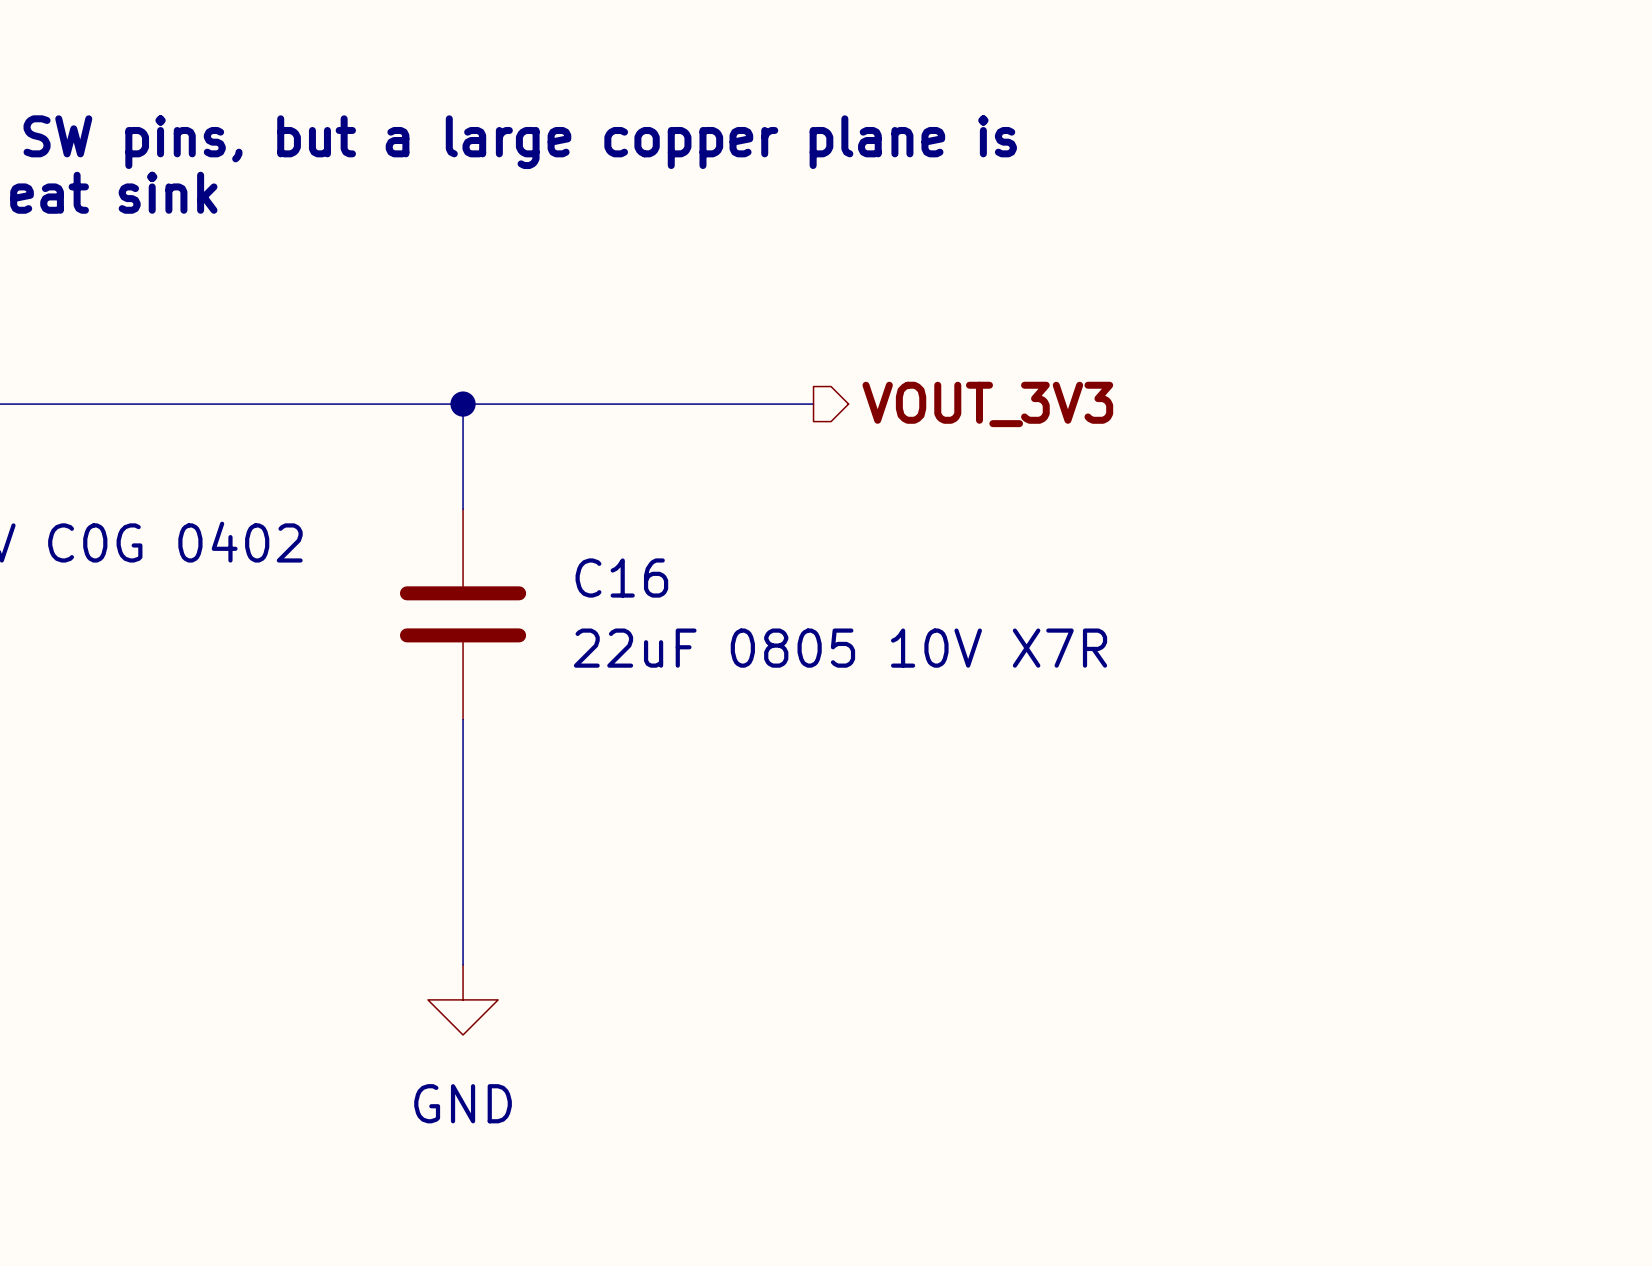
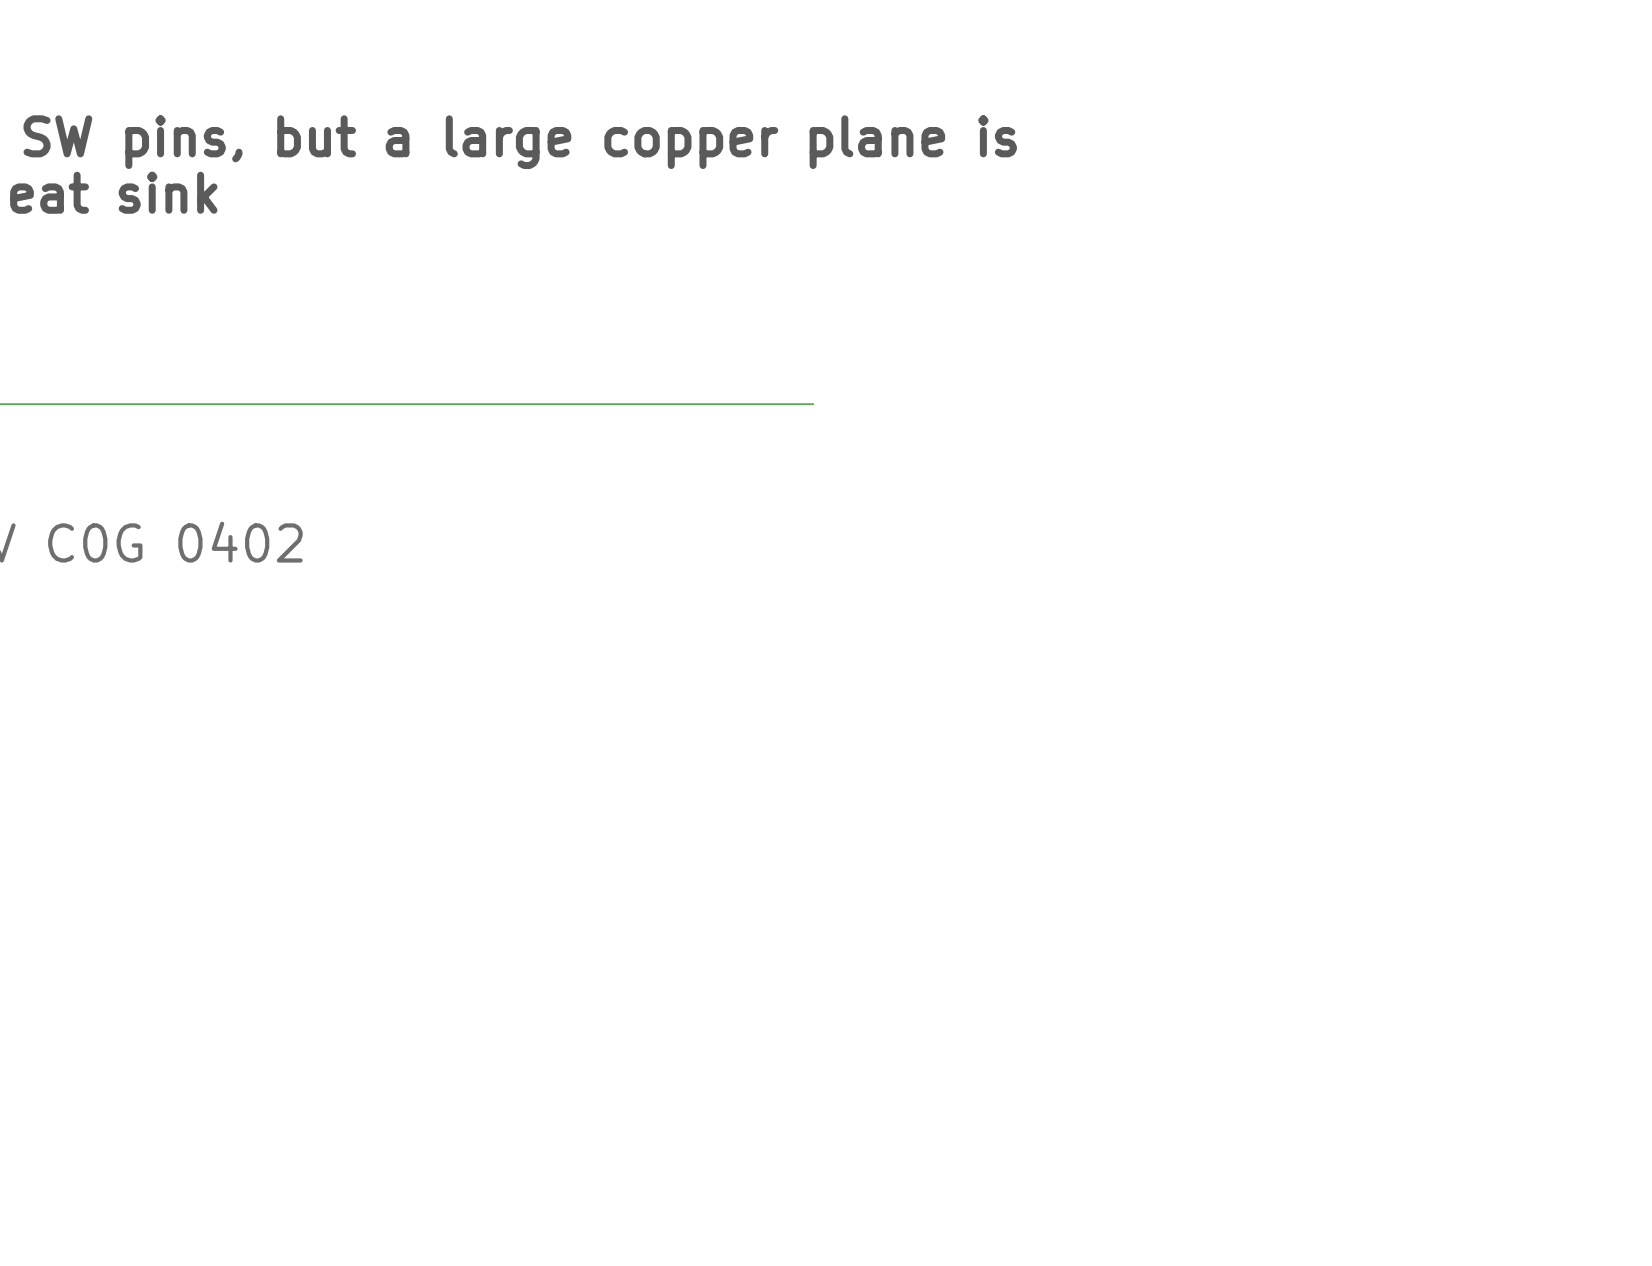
wire: (463, 404) (463, 509) -> none
junction: (463, 404) -> none
hierarchical label: VOUT_3V3 (987, 404) -> none
C16: 22uF 0805 10V X7R (463, 614) -> none
wire: (463, 719) (463, 964) -> none
power symbol: GND (463, 999) -> none

